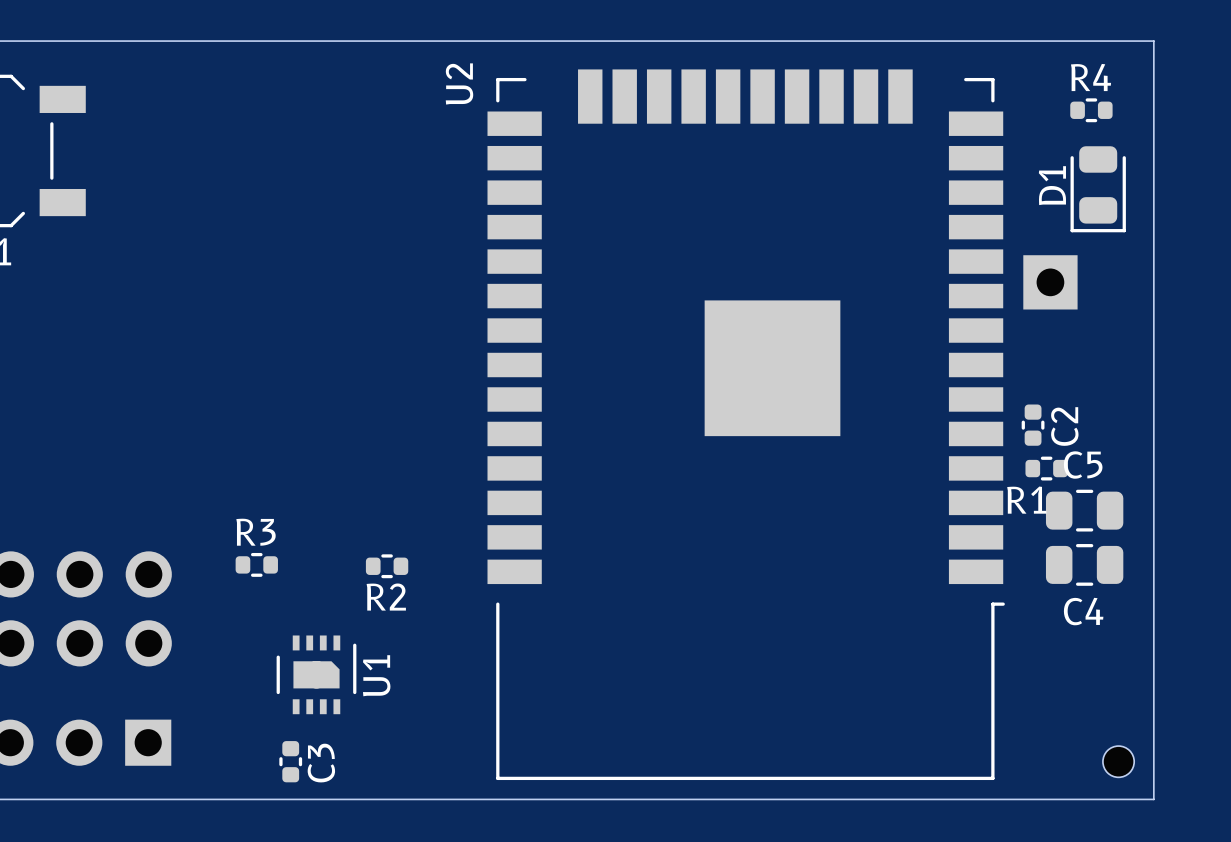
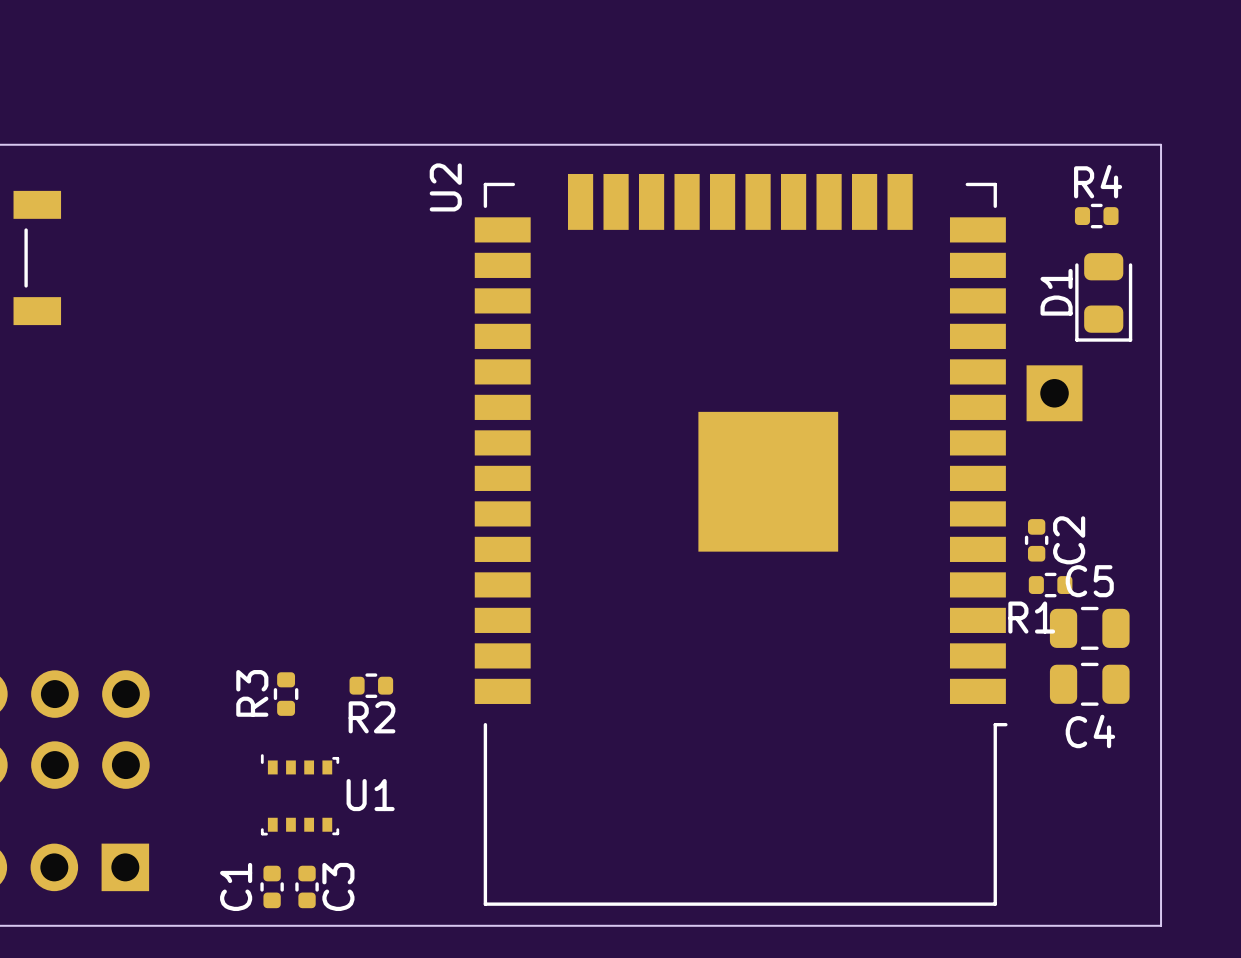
R3 rotation: 0° (256, 564) -> 90° clockwise (286, 694)
R3 position: (256, 564) -> (286, 694)
U1 footprint: [276, 635, 357, 715] -> [260, 754, 340, 836]
C3: none -> (307, 886)
part: (1118, 761) -> none
C3 name: C3 (321, 763) -> C1 (236, 886)

